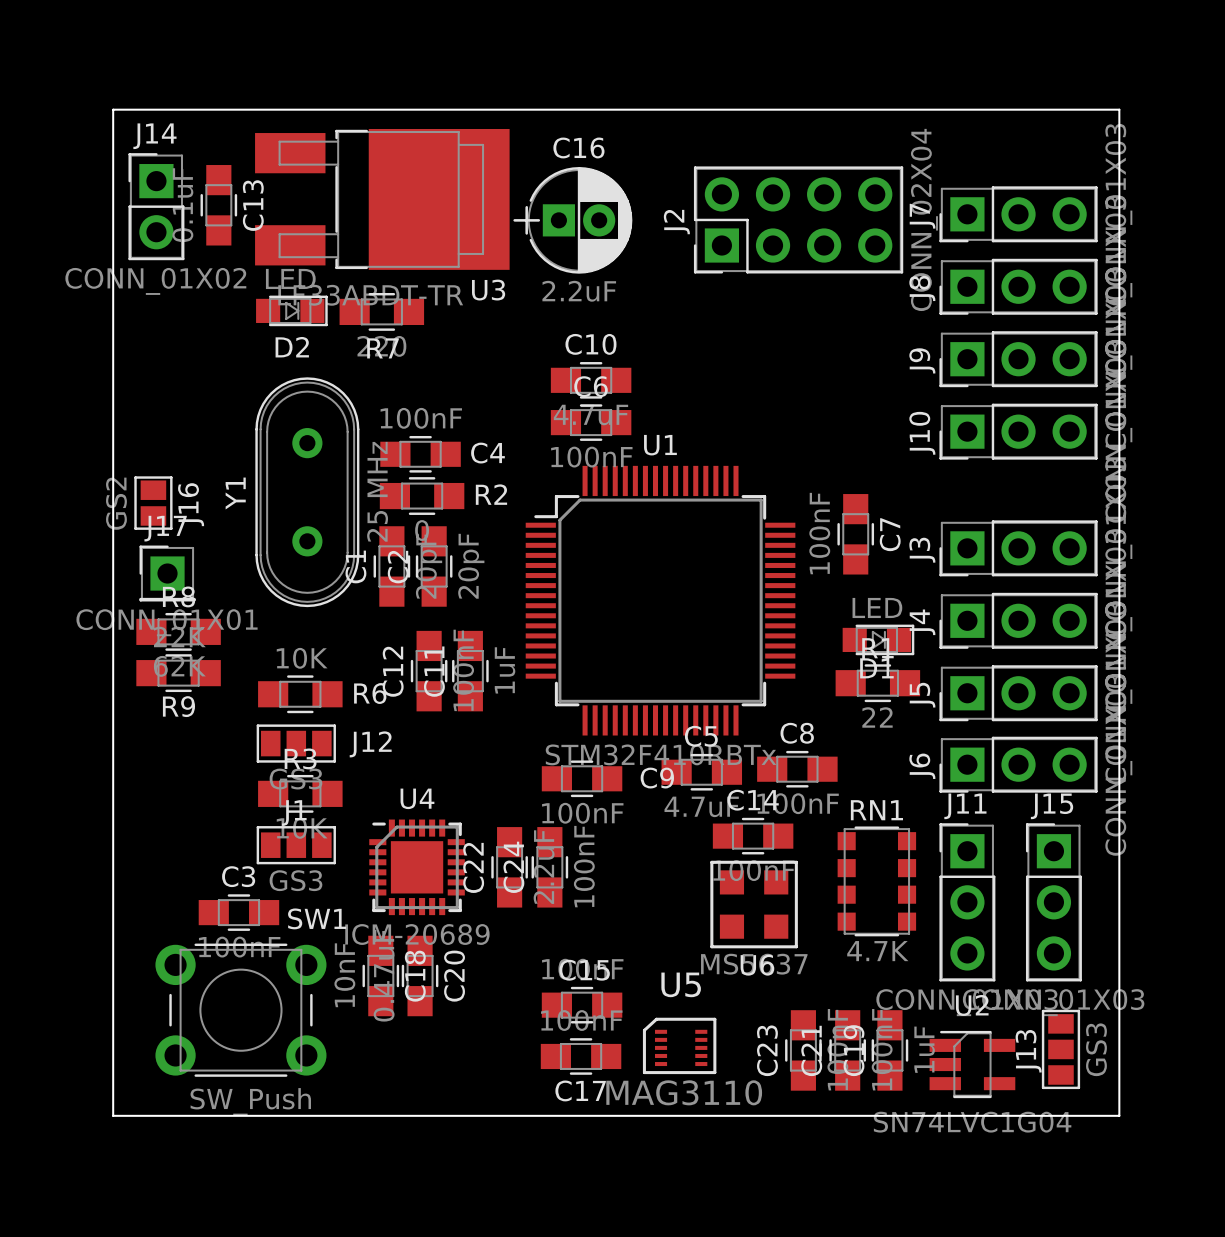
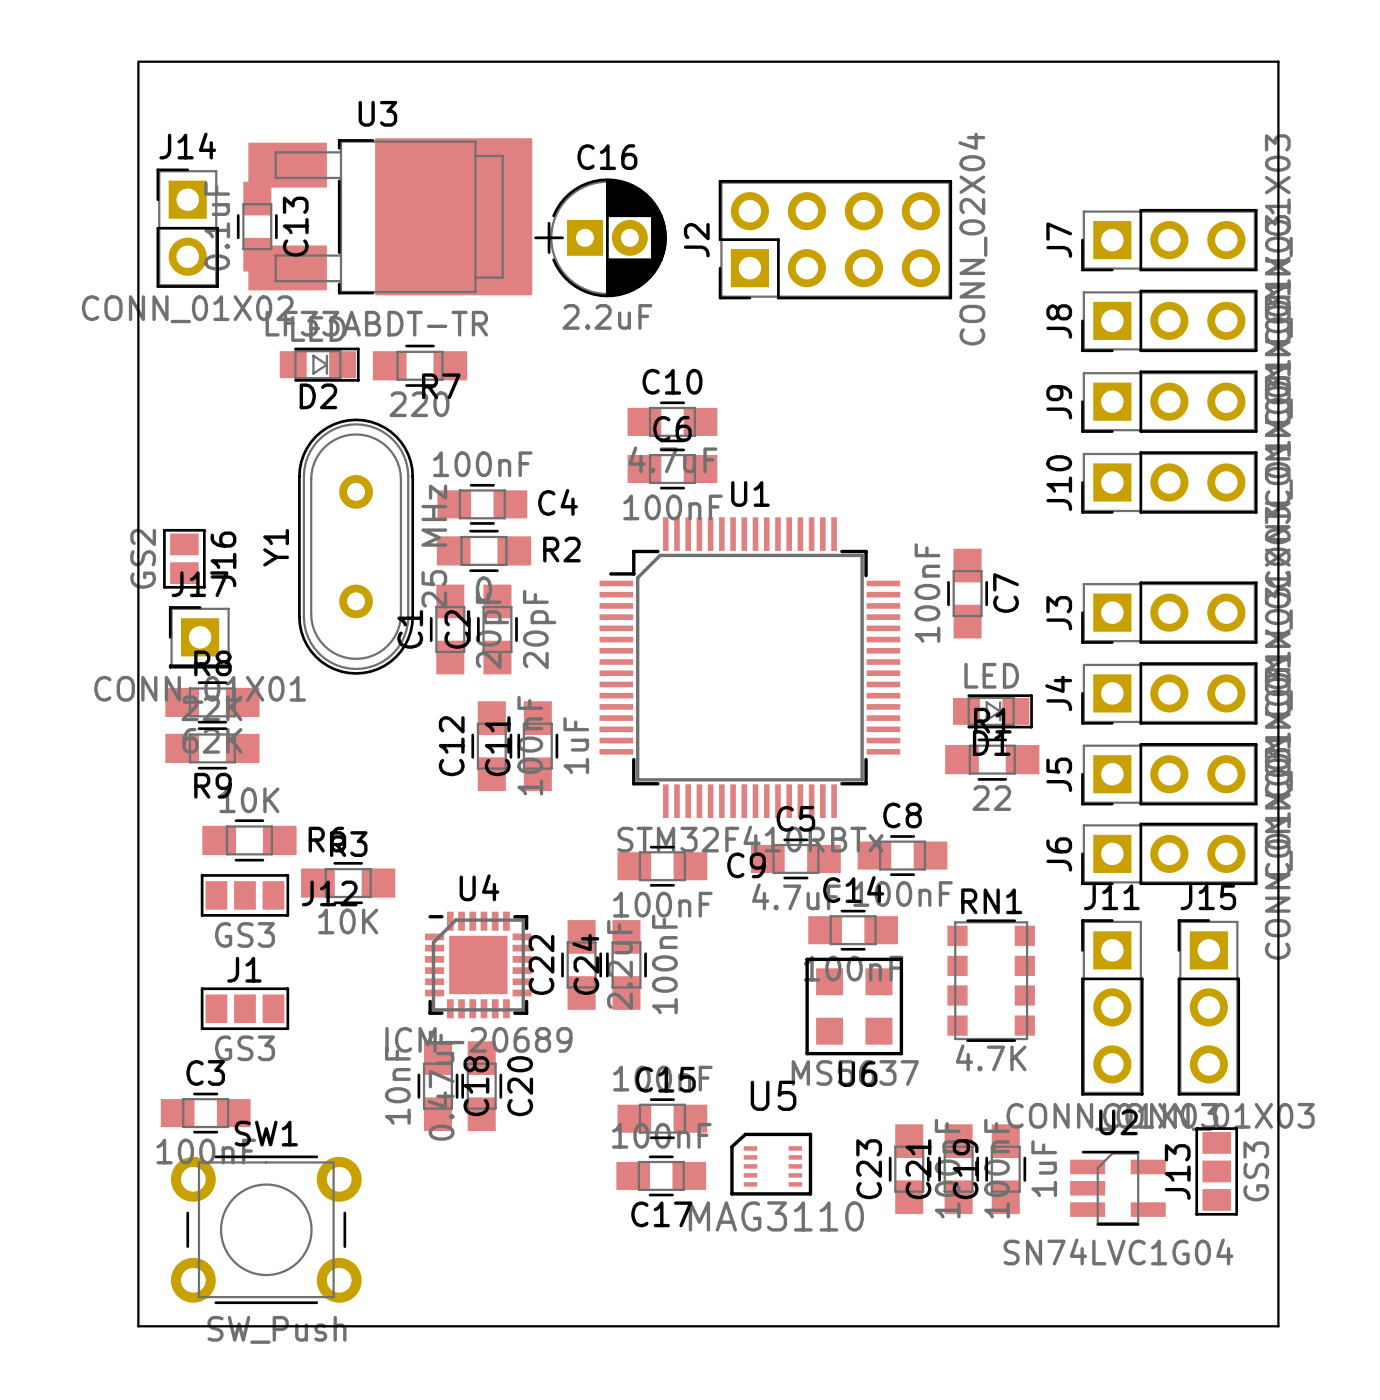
board edge: none -> (138, 61) (1278, 61) (1278, 1326) (138, 1326) (138, 62)
board edge: (113, 109) (1119, 109) (1119, 1115) (113, 1115) (113, 109) -> none
U3 position: (382, 199) -> (390, 216)
J7 position: (1018, 214) -> (1169, 240)
J2 position: (798, 219) -> (835, 239)
C16 position: (572, 220) -> (600, 237)
J8 position: (1018, 286) -> (1169, 320)
U3 name position: U3 (488, 290) -> U3 (377, 113)
D2 position: (291, 310) -> (319, 364)
R7 position: (381, 311) -> (420, 365)
D2 name position: D2 (292, 347) -> D2 (318, 396)
J9 position: (1018, 359) -> (1169, 401)
J10 position: (1018, 431) -> (1169, 482)
J3 position: (1018, 548) -> (1169, 612)
J4 position: (1018, 620) -> (1169, 693)
J5 position: (1018, 693) -> (1169, 774)
R6 position: (300, 694) -> (249, 840)
J12 position: (296, 743) -> (244, 895)
J6 position: (1018, 764) -> (1169, 853)
J1 position: (296, 845) -> (244, 1008)
J11 position: (967, 902) -> (1112, 1007)
J15 position: (1053, 902) -> (1208, 1007)
C3 position: (238, 912) -> (205, 1113)
SW1 name position: SW1 (317, 918) -> SW1 (266, 1133)
SW1 position: (240, 1010) -> (266, 1229)
J13 position: (1060, 1049) -> (1216, 1171)
U2 position: (972, 1064) -> (1117, 1188)

